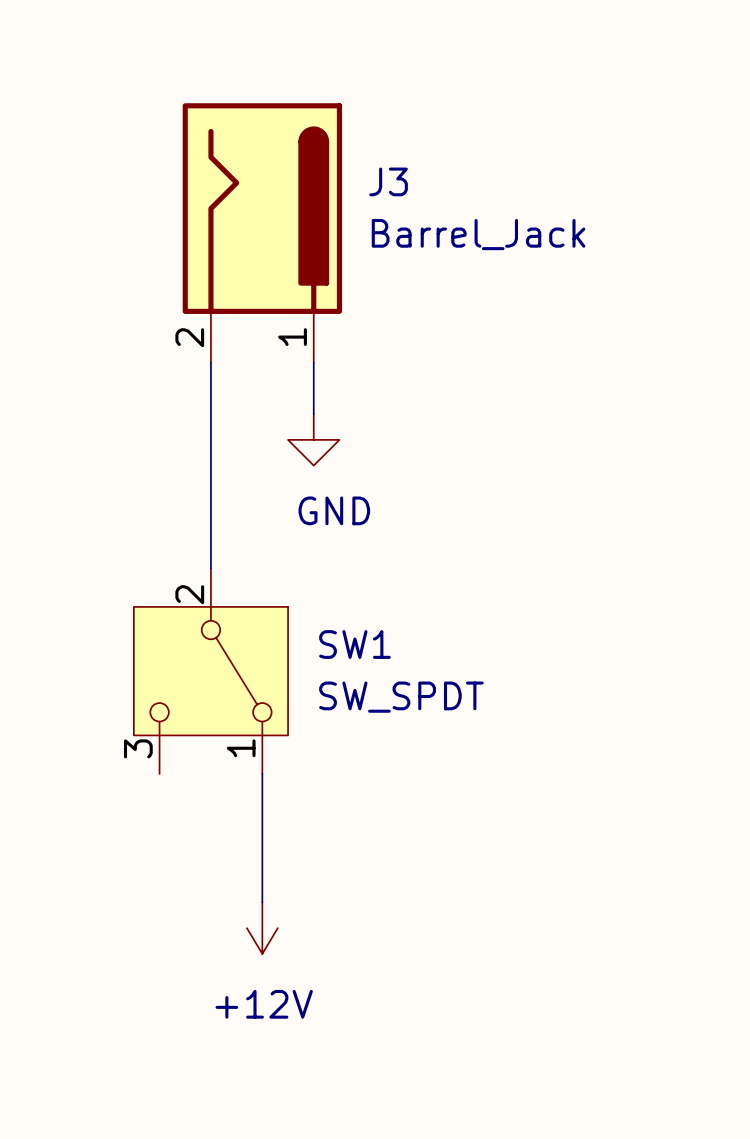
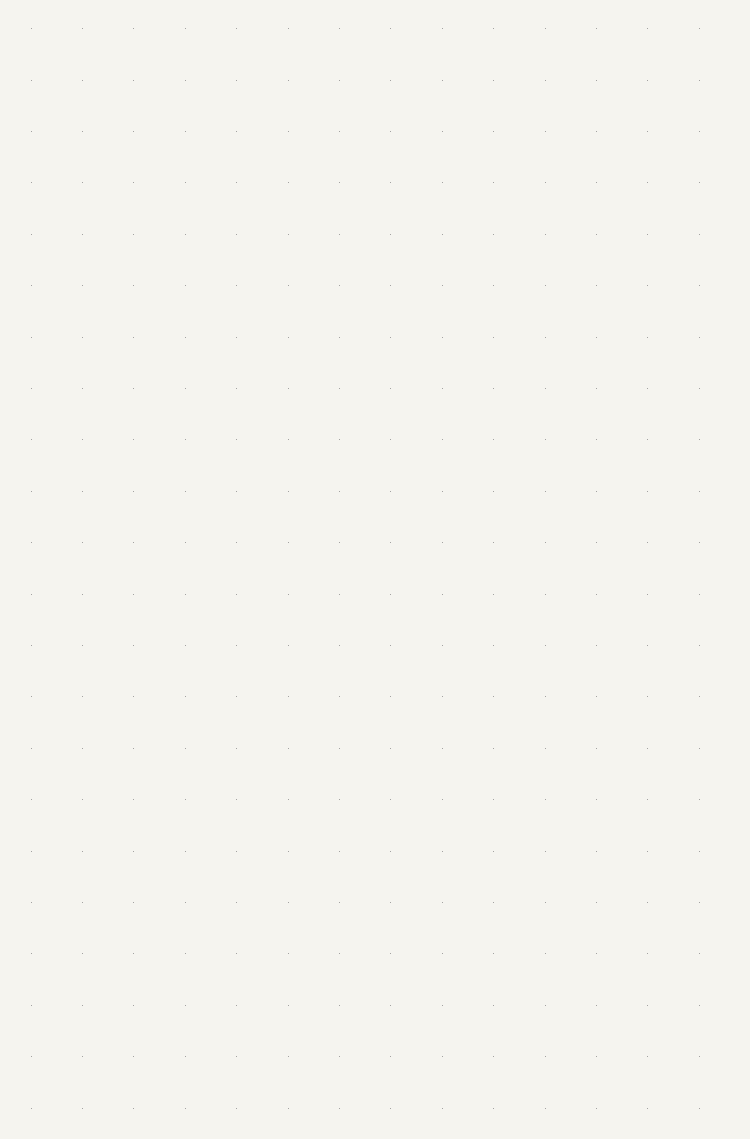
J3: Barrel_Jack (262, 233) -> none
wire: (210, 362) (210, 568) -> none
wire: (313, 362) (313, 414) -> none
power symbol: GND (313, 439) -> none
SW1: SW_SPDT (210, 671) -> none
wire: (262, 773) (262, 902) -> none
power symbol: +12V (262, 928) -> none

